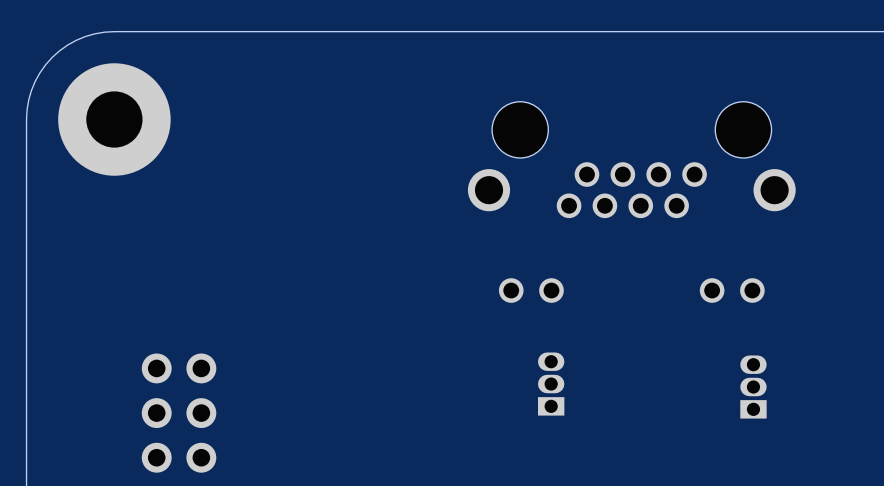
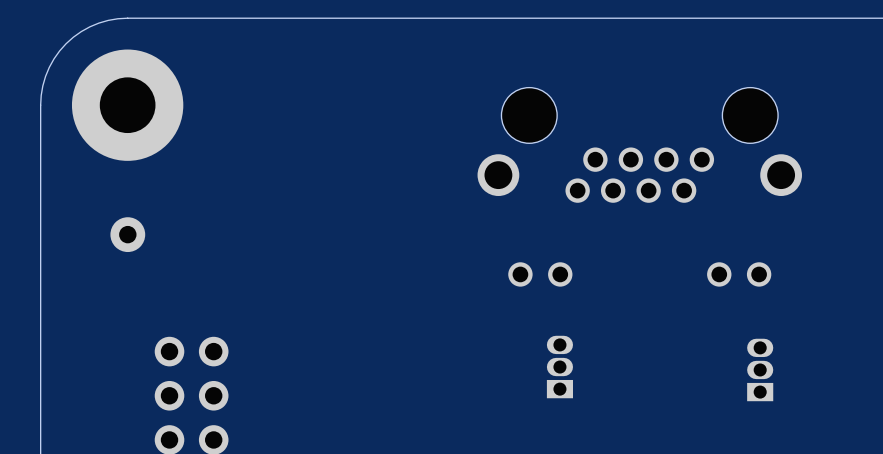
part: none -> (127, 234)

